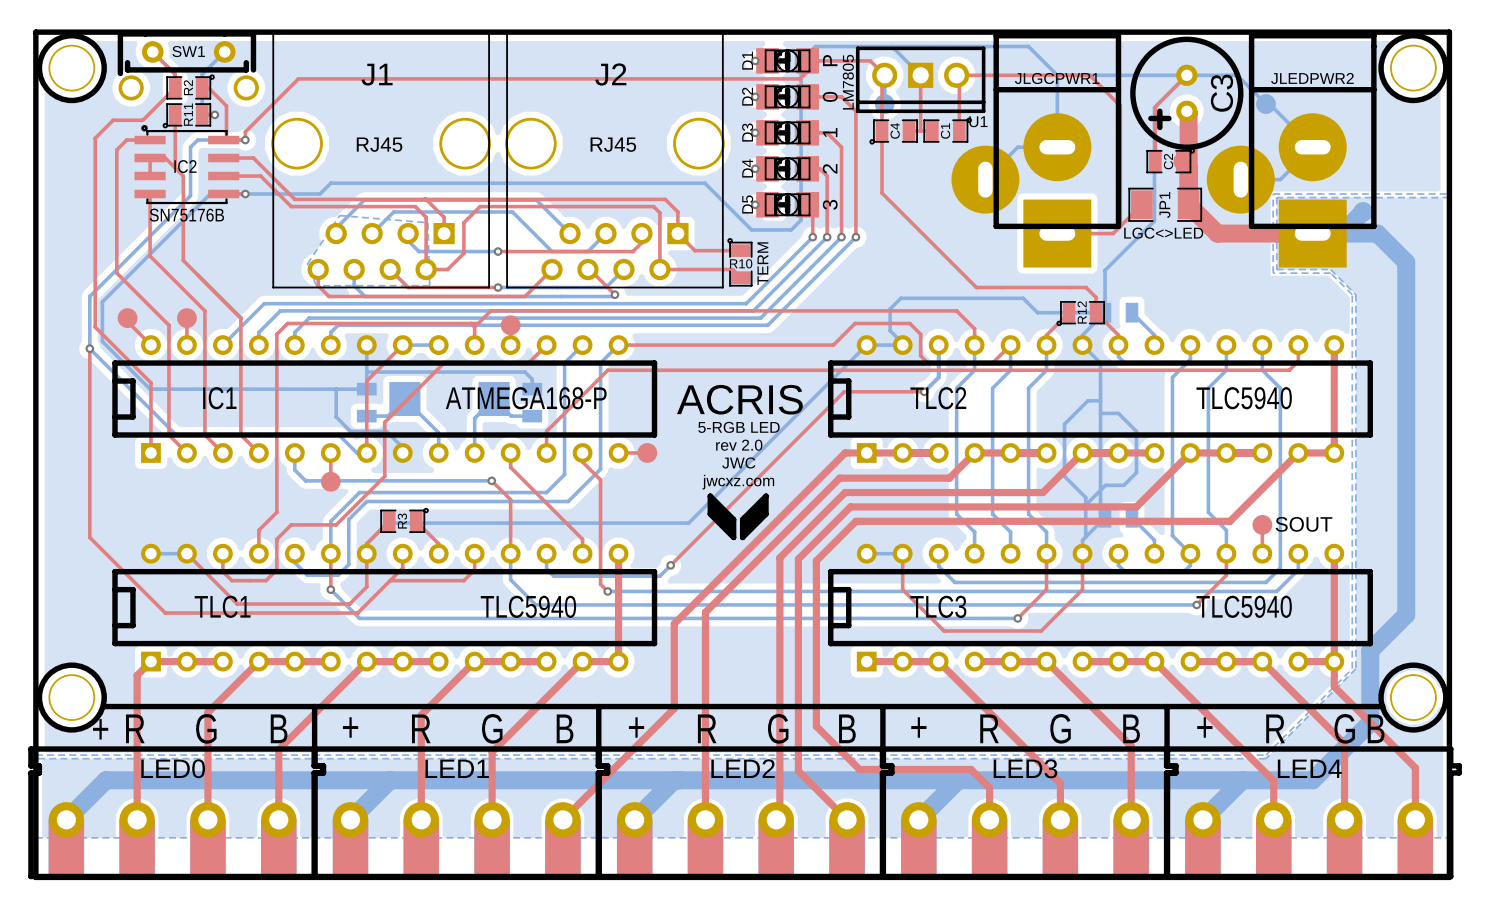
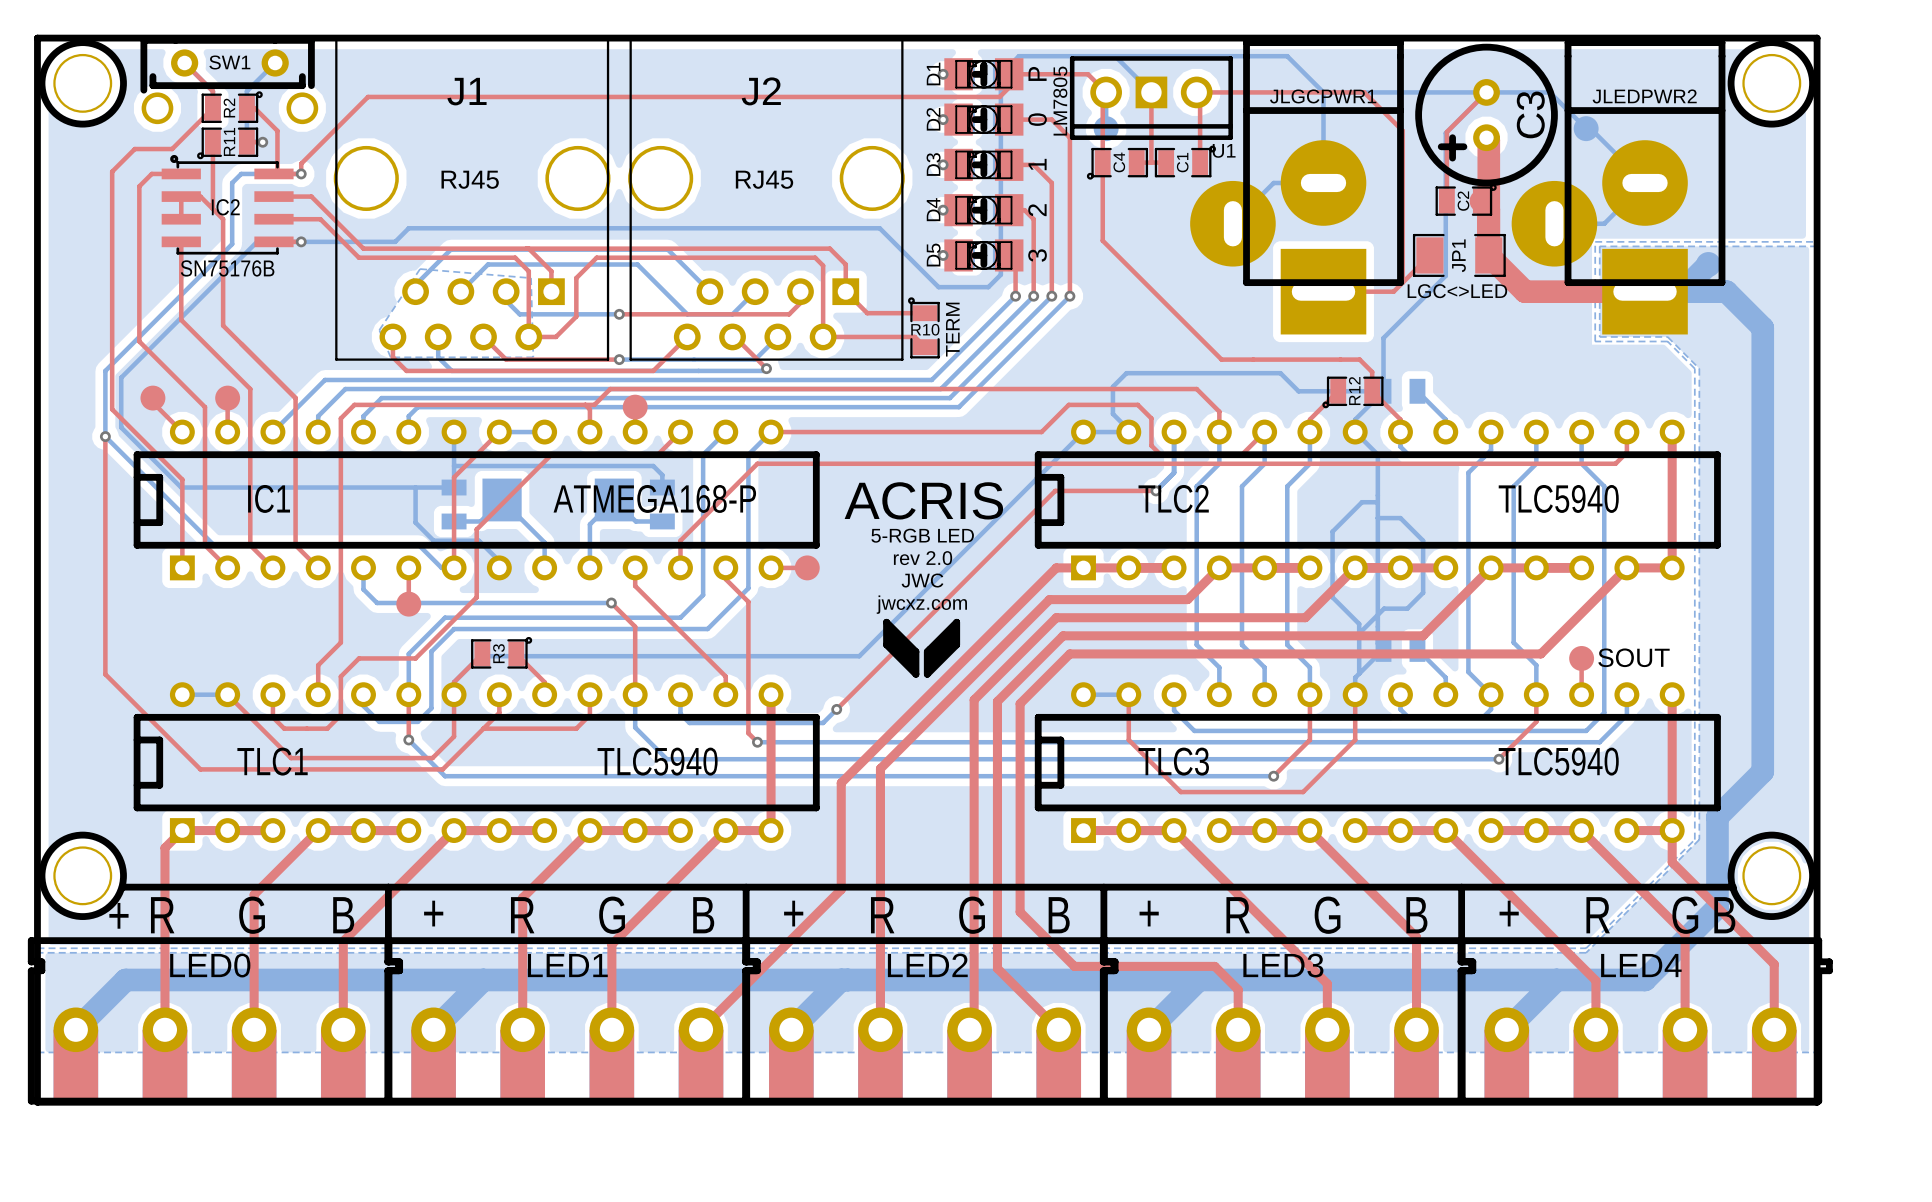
JLGCPWR1 footprint: [951, 33, 1122, 268] -> [1190, 39, 1404, 335]
JLEDPWR2 footprint: [1206, 33, 1377, 268] -> [1511, 39, 1726, 335]

